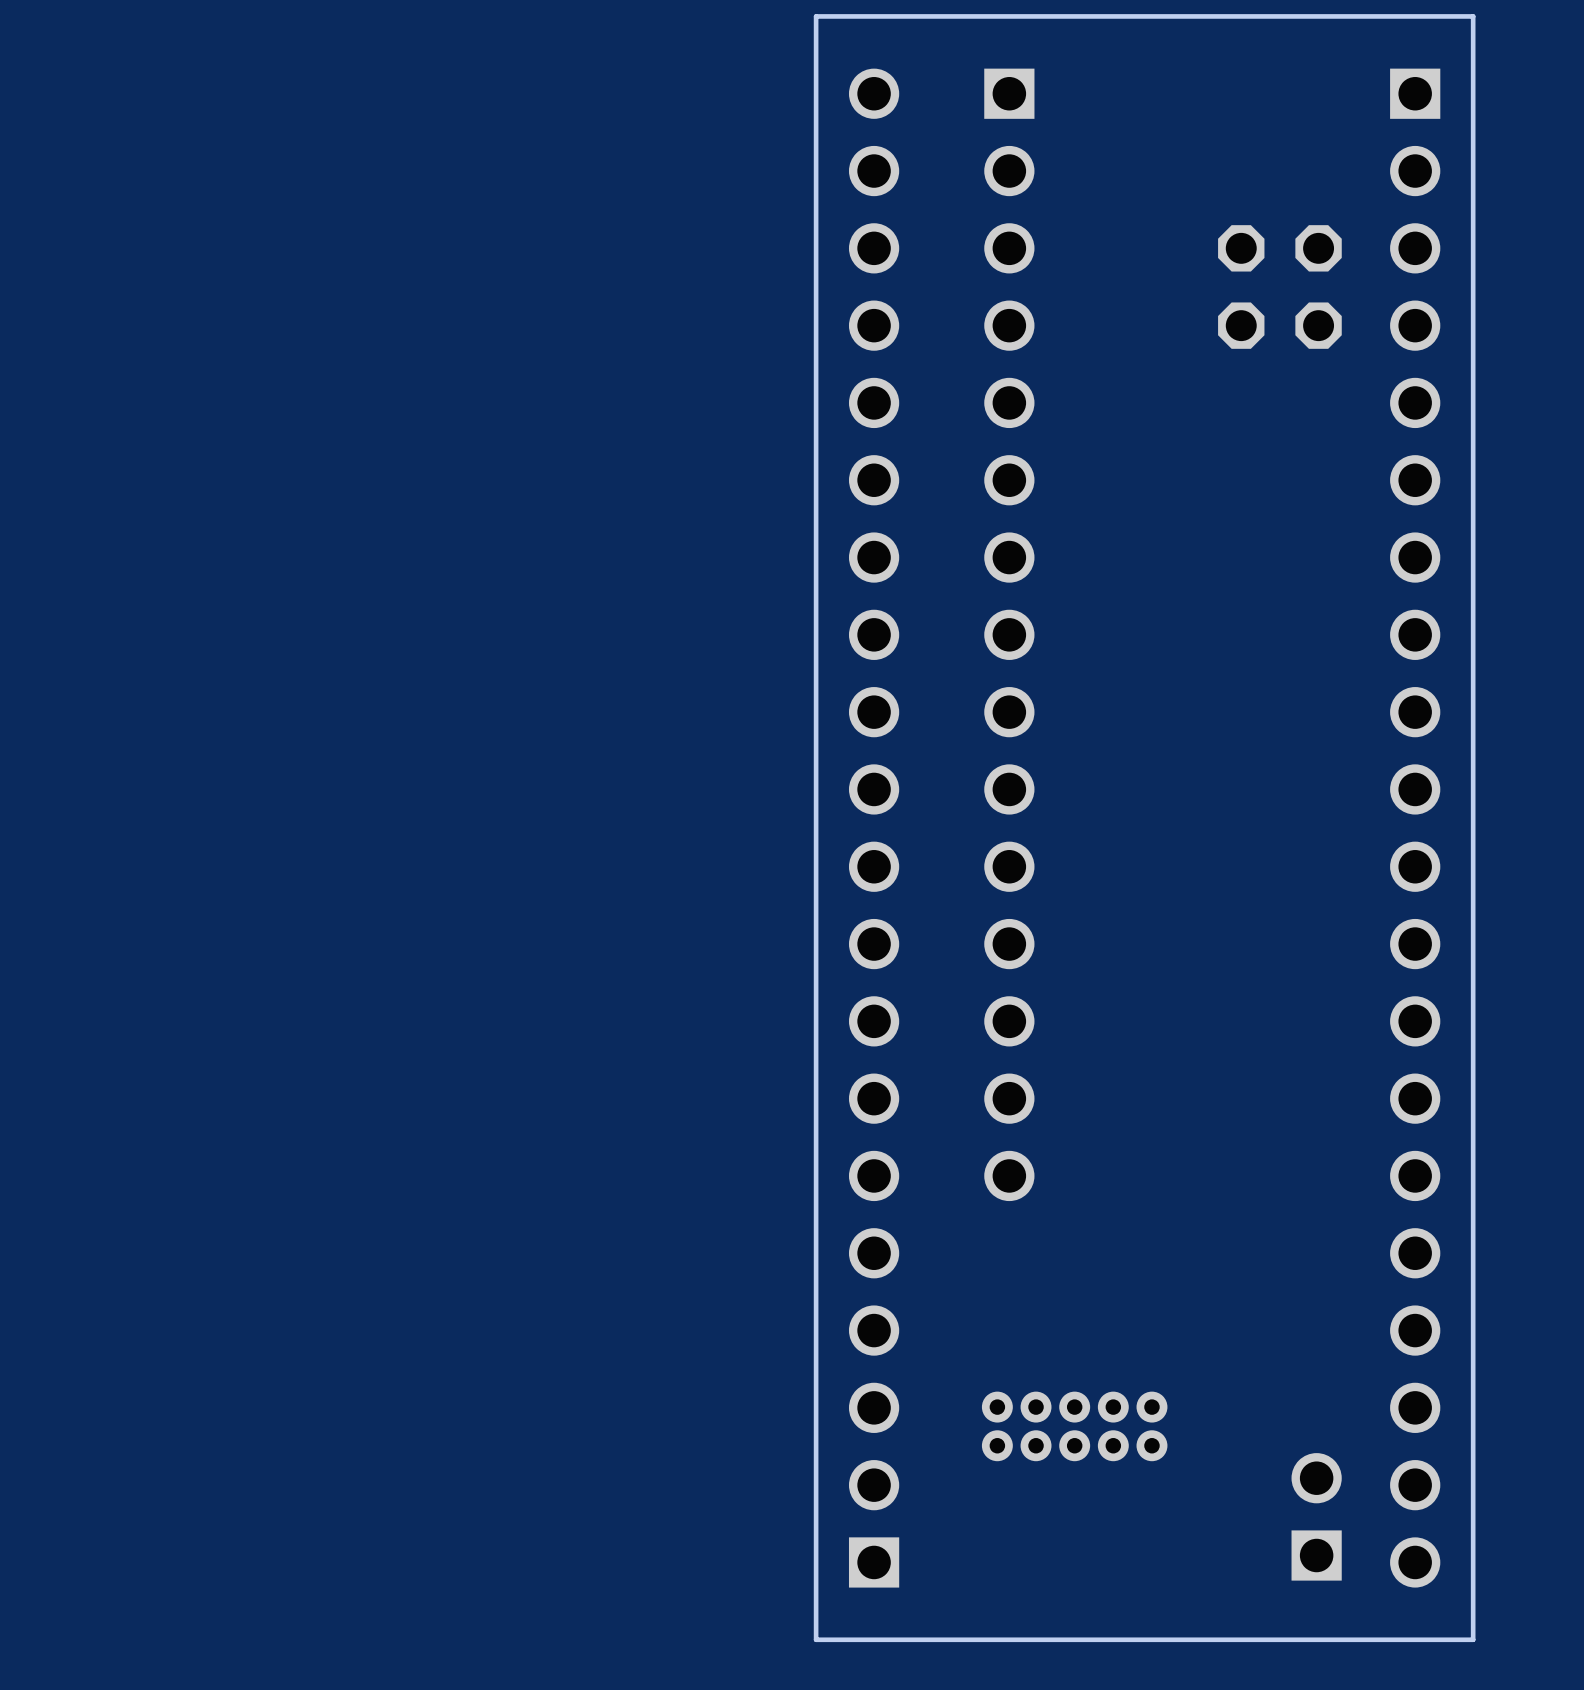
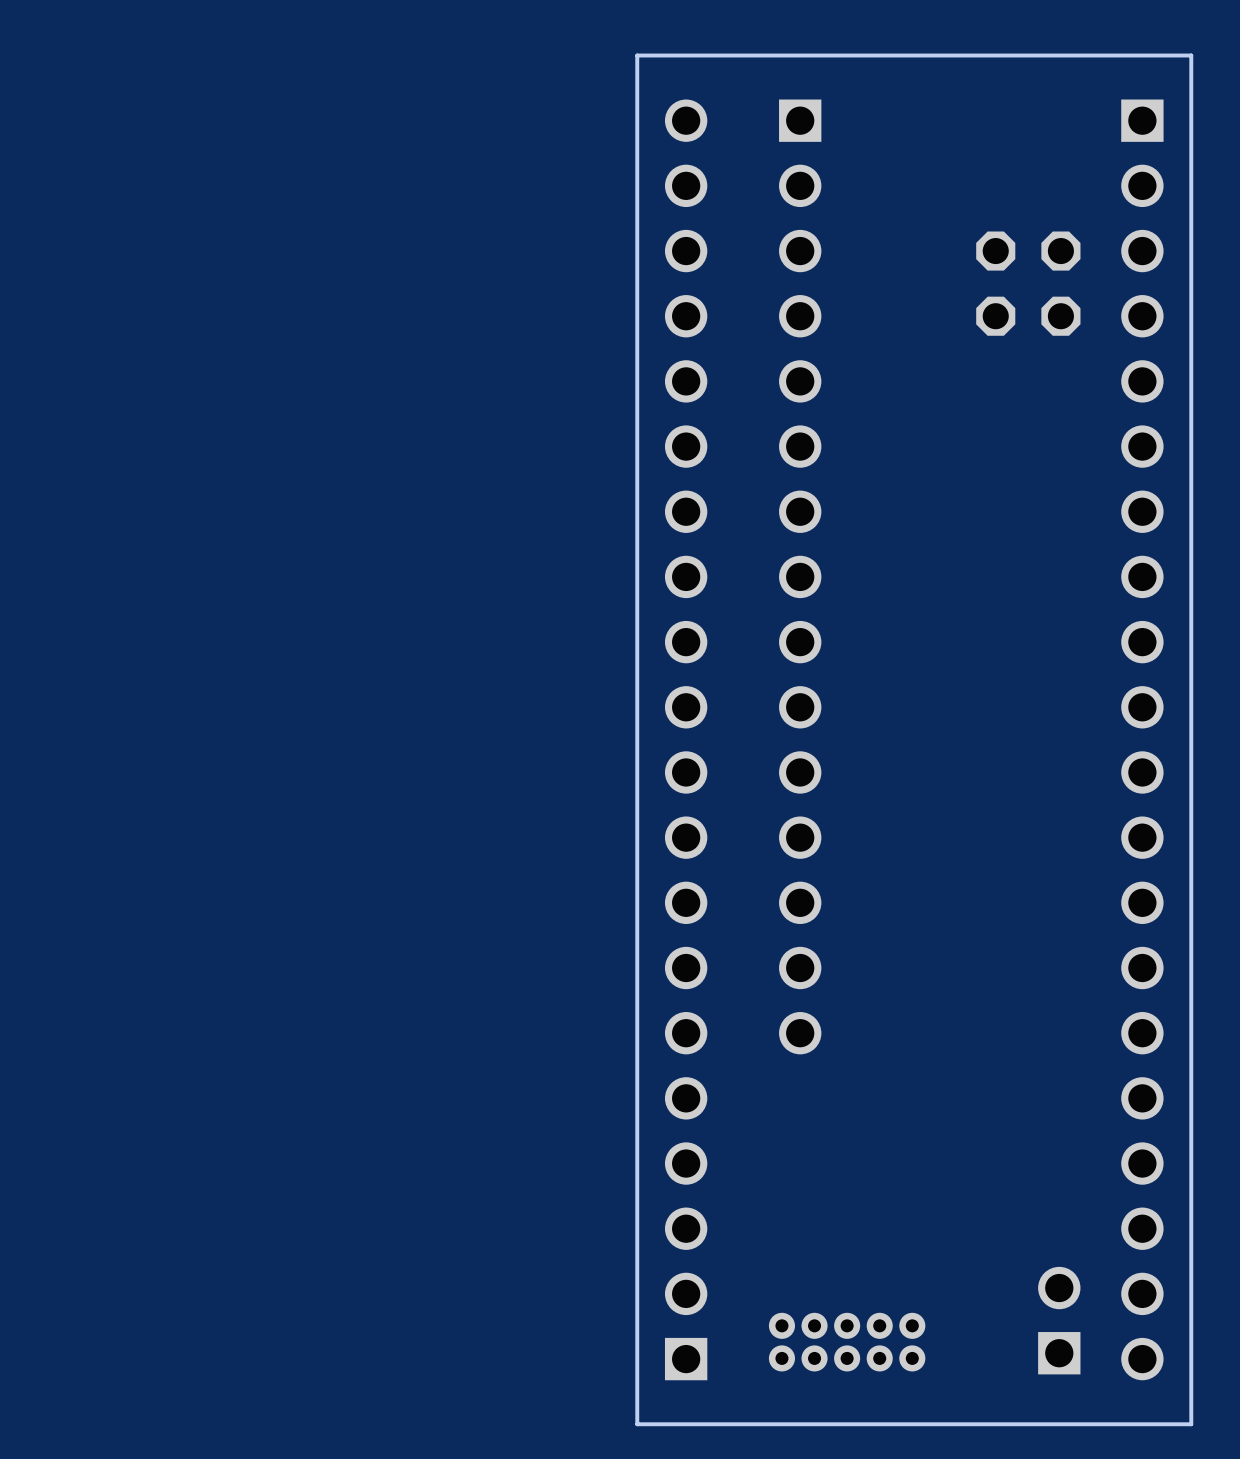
part position: (1074, 1426) -> (847, 1342)

